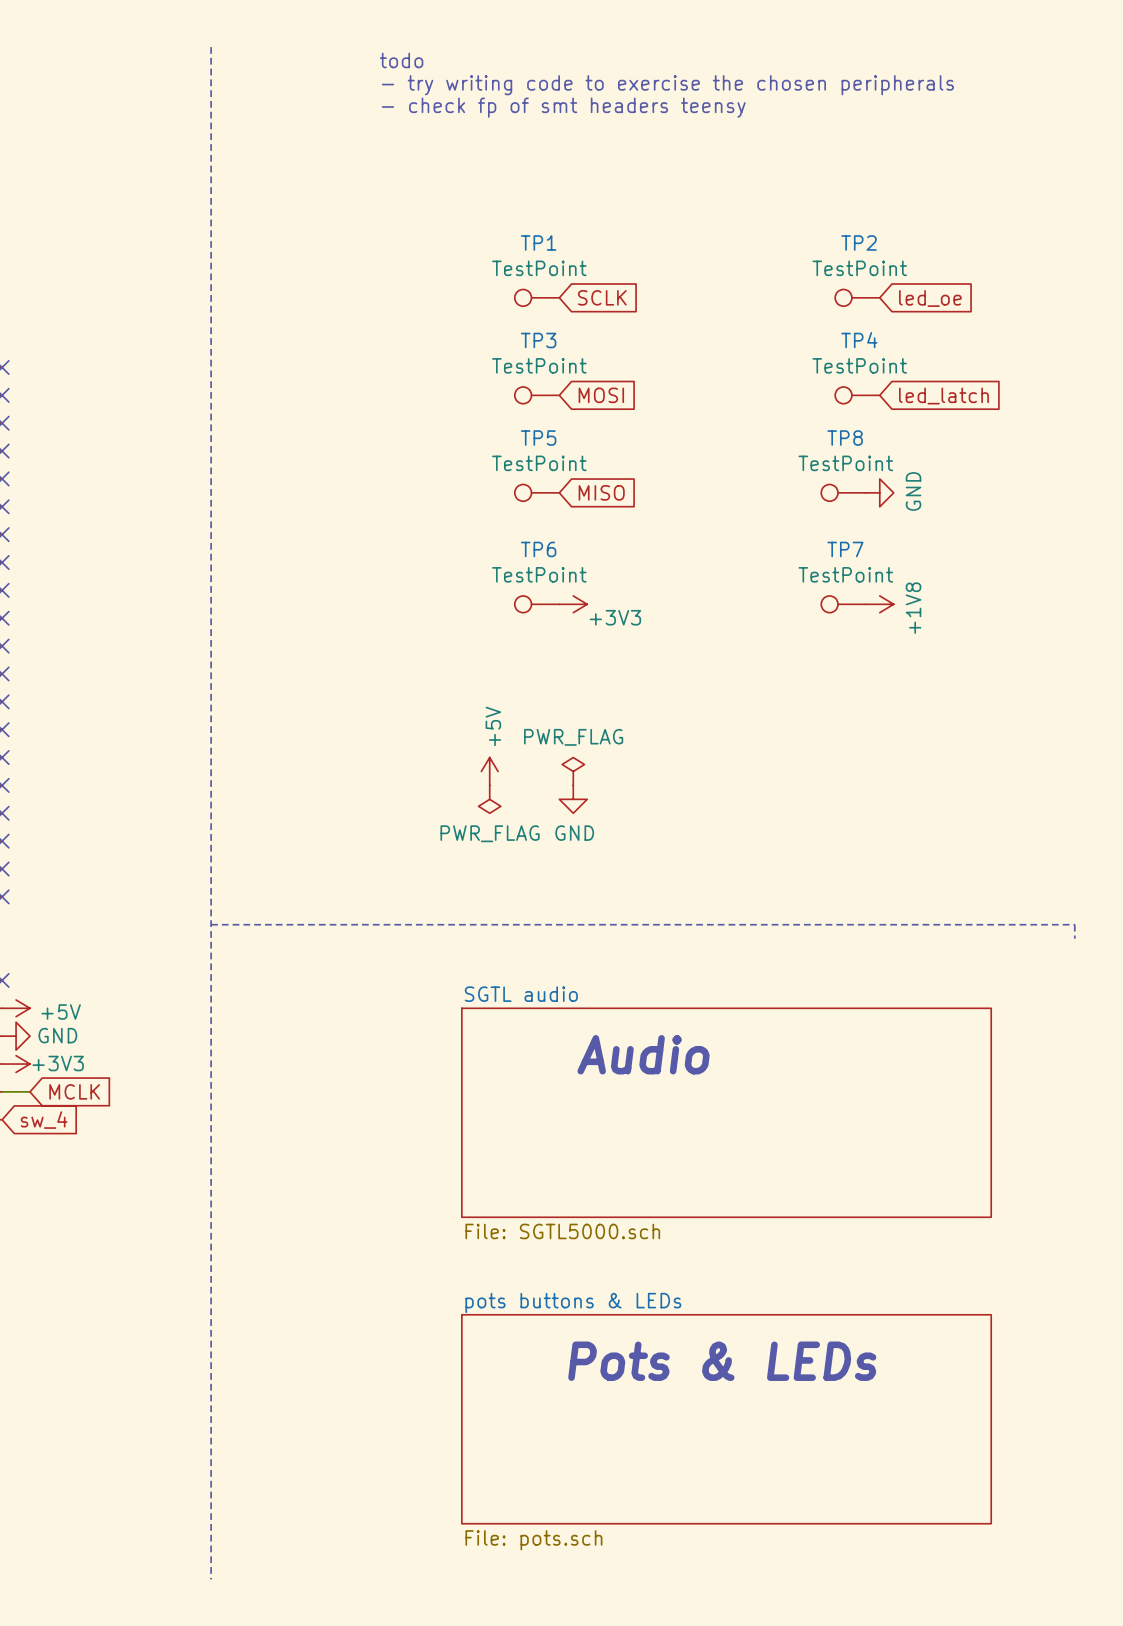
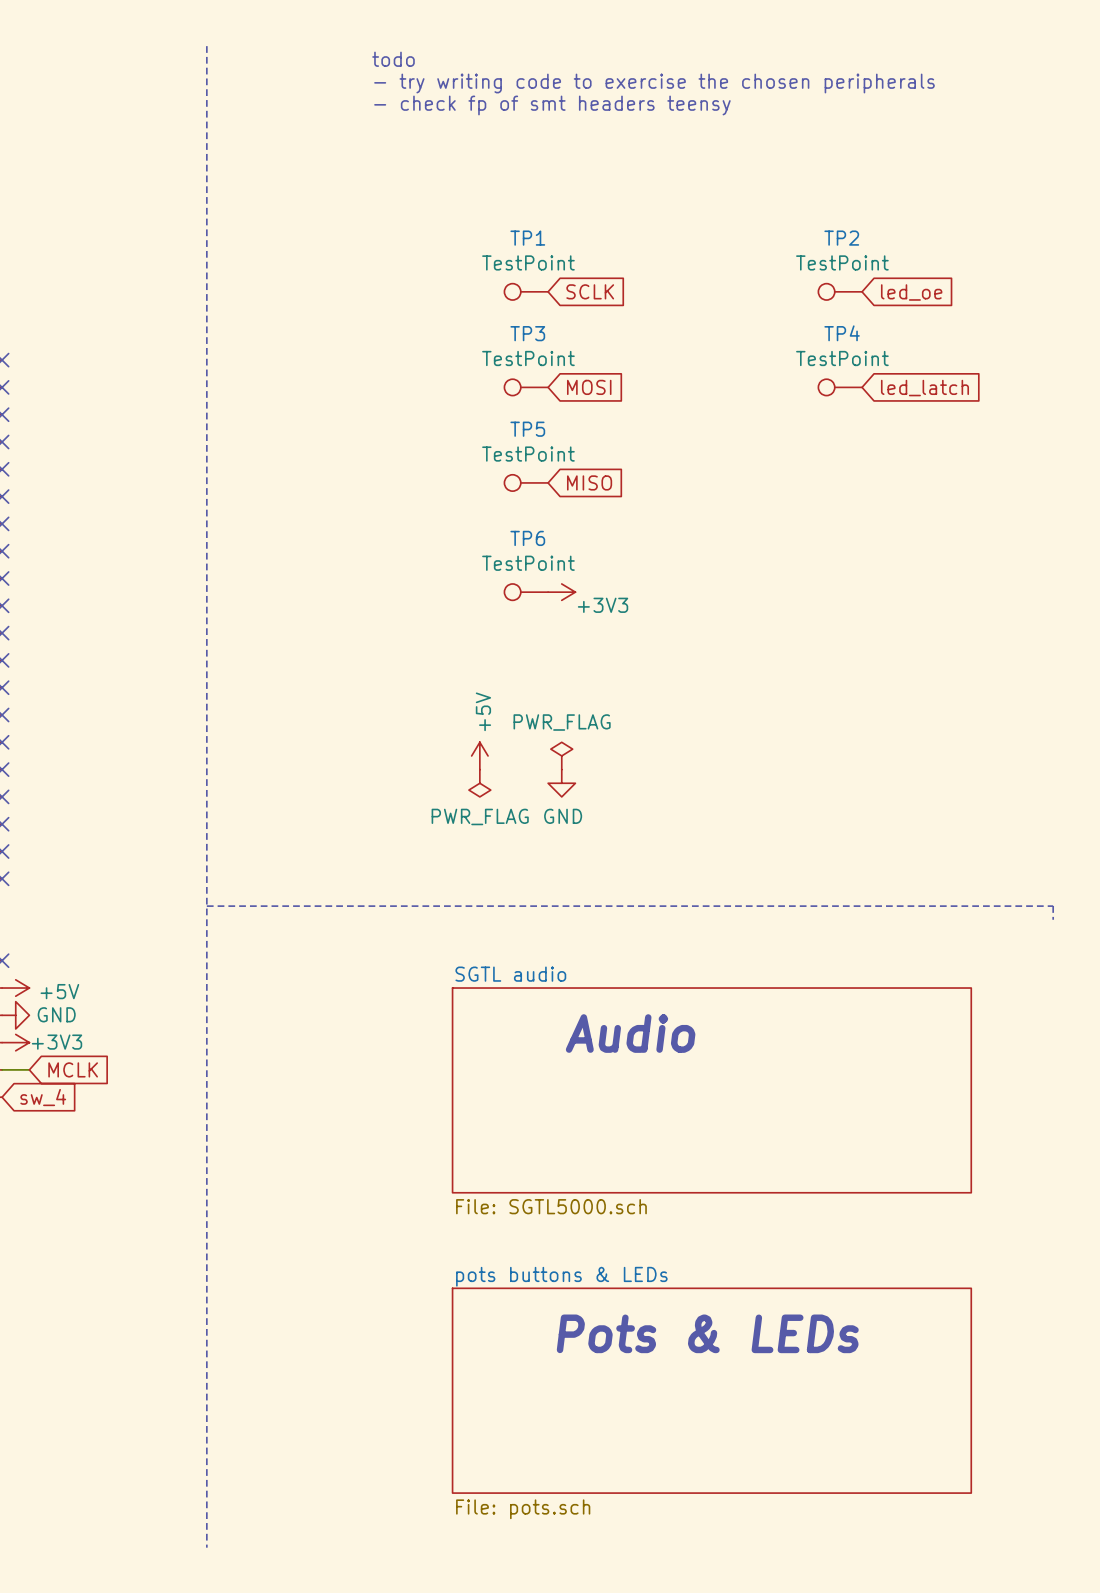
TP8: TestPoint (843, 492) -> none
power symbol: GND (879, 492) -> none
TP7: TestPoint (843, 604) -> none
power symbol: +1V8 (879, 604) -> none

